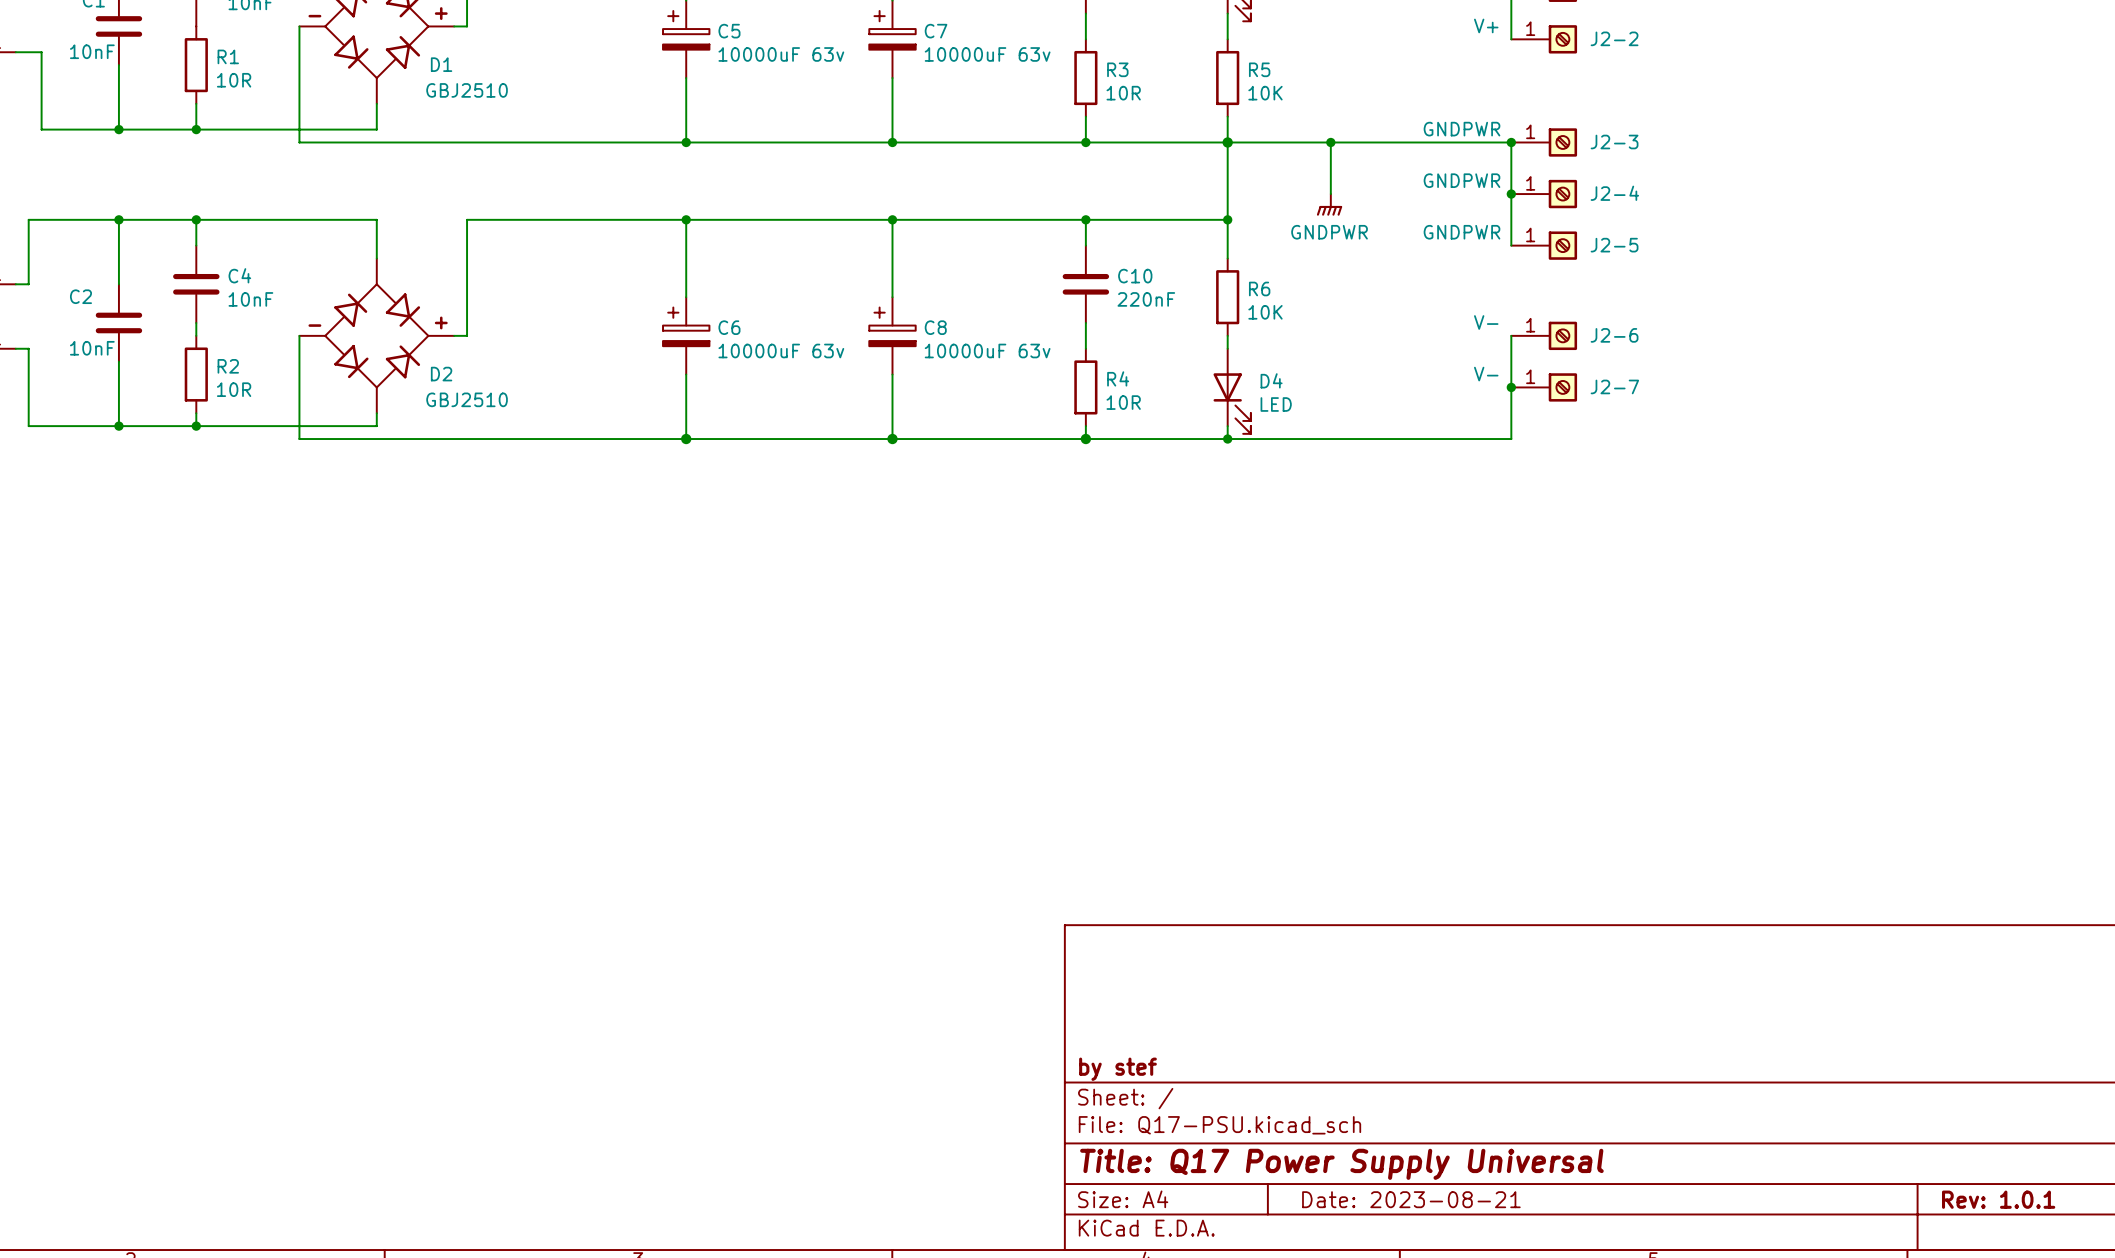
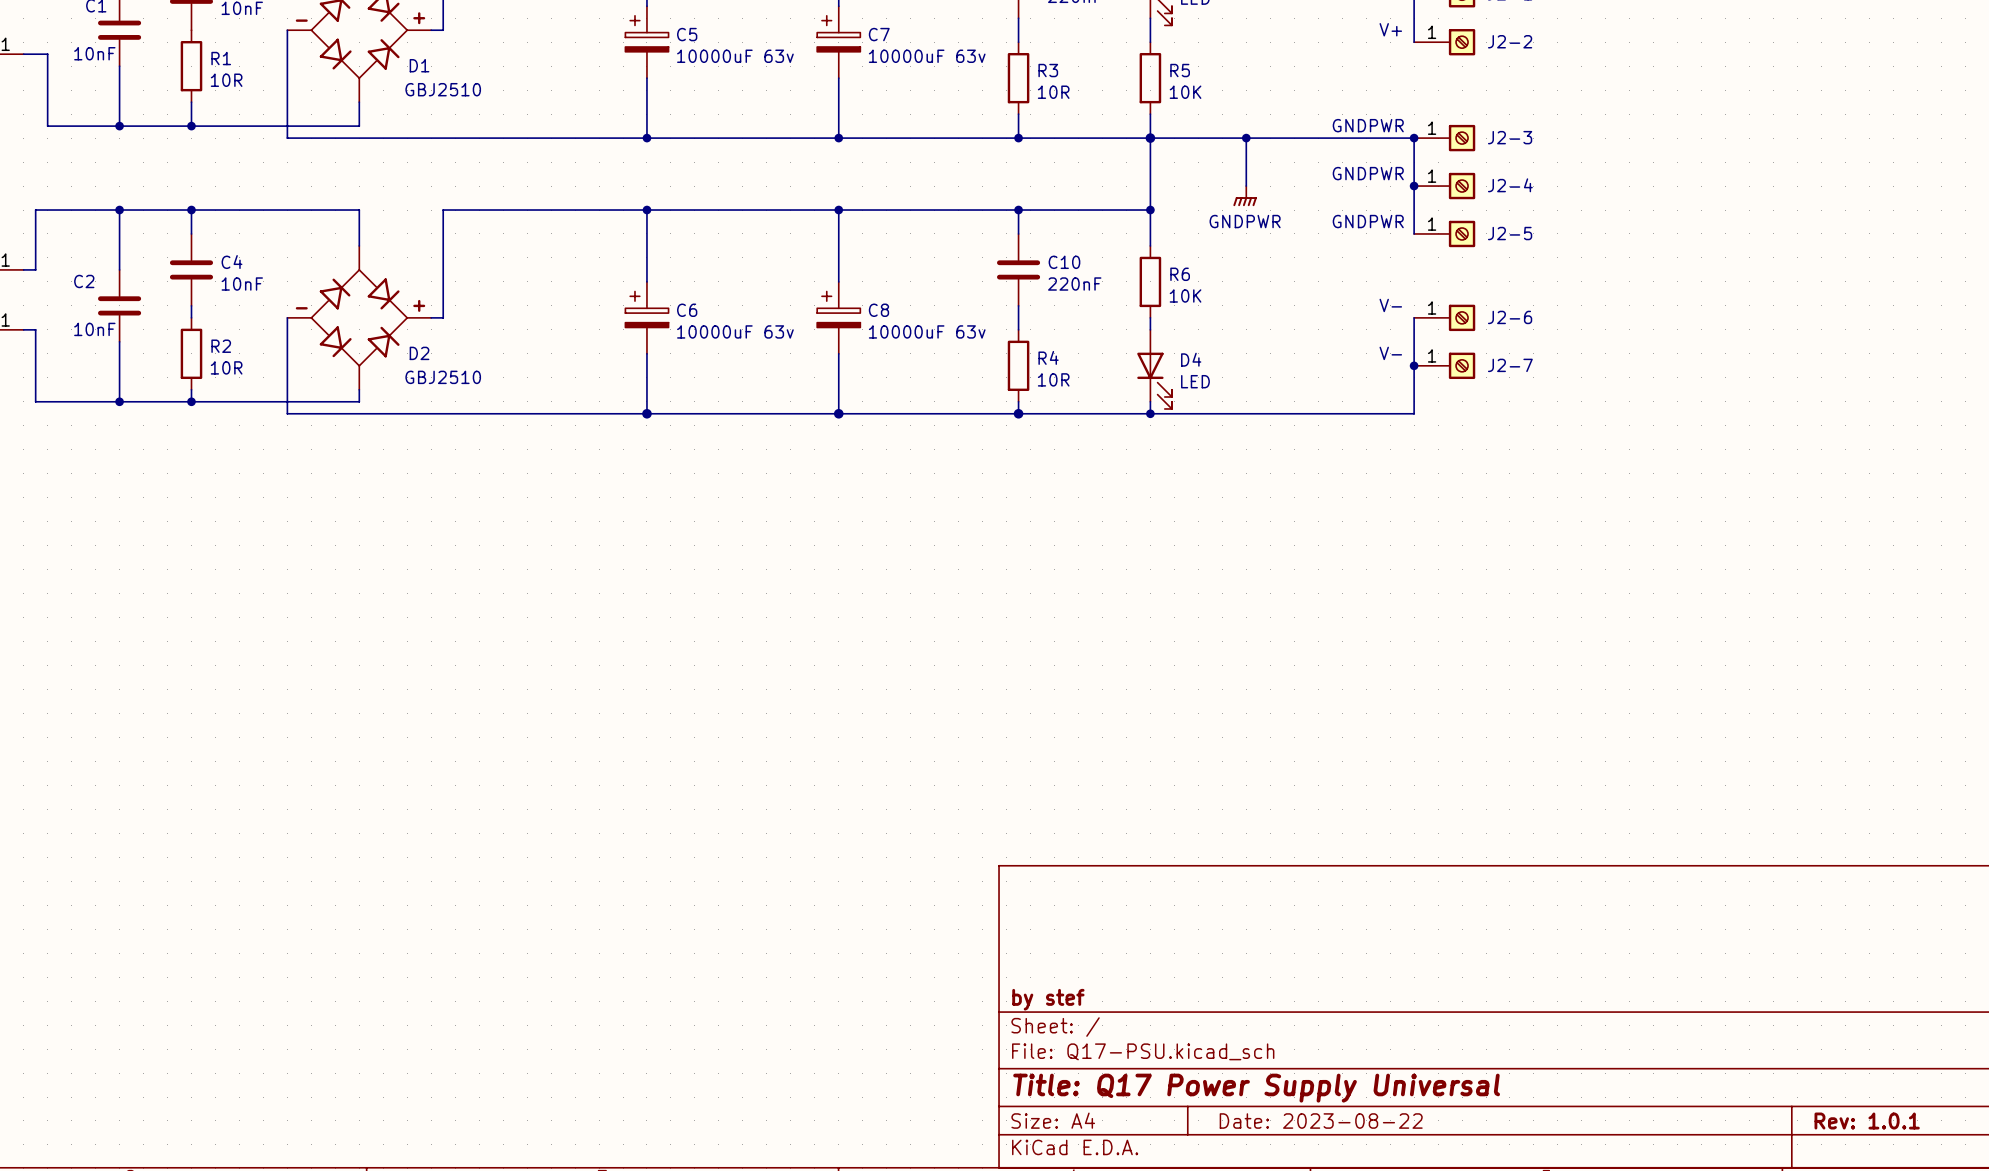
title block: Date: 2023-08-21 (1411, 1199) -> Date: 2023-08-22 (1321, 1121)

